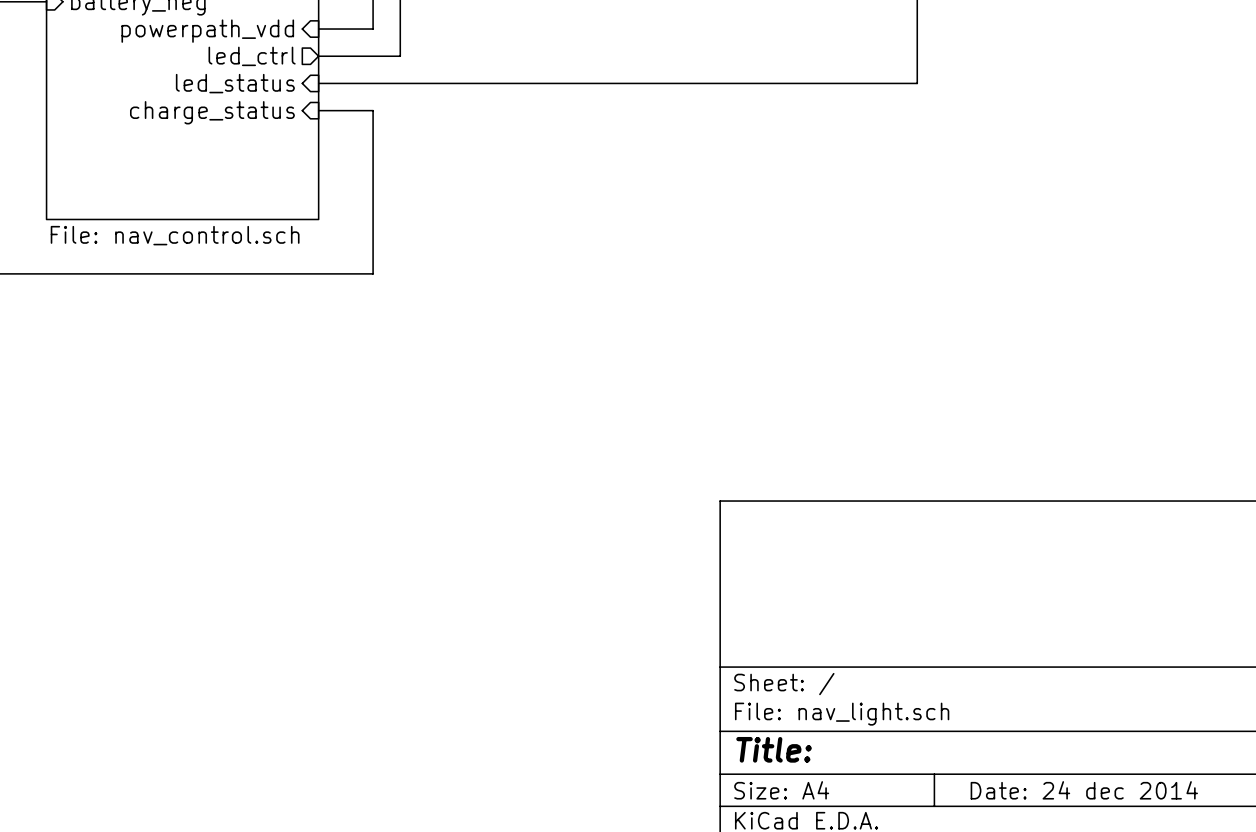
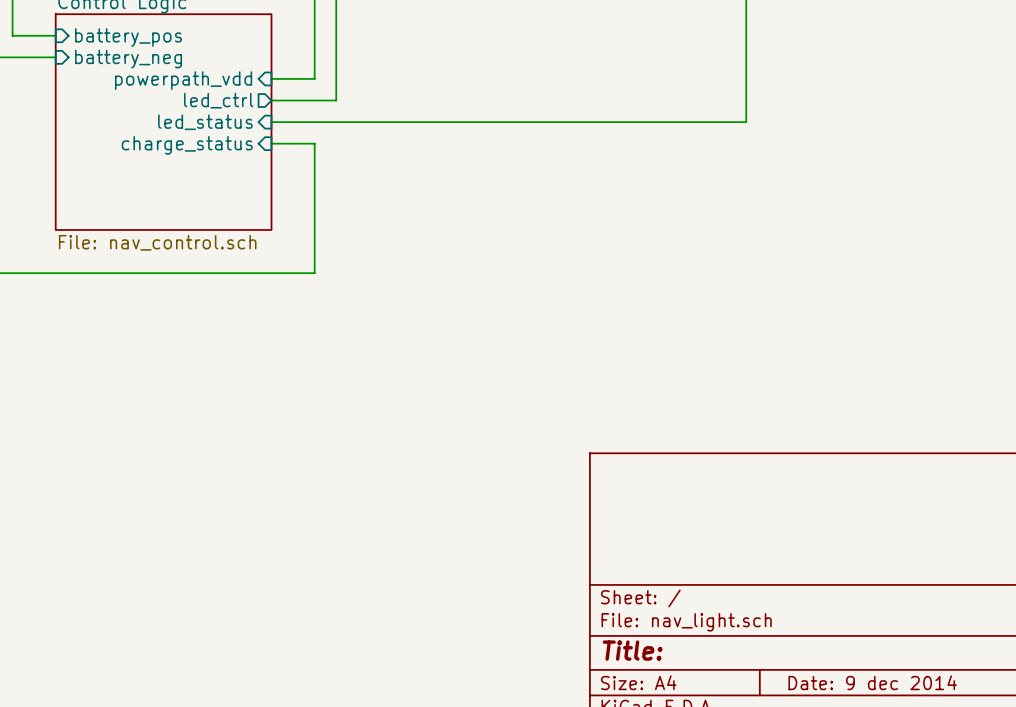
title block: Date: 24 dec 2014 (1084, 790) -> Date: 9 dec 2014 (872, 682)

